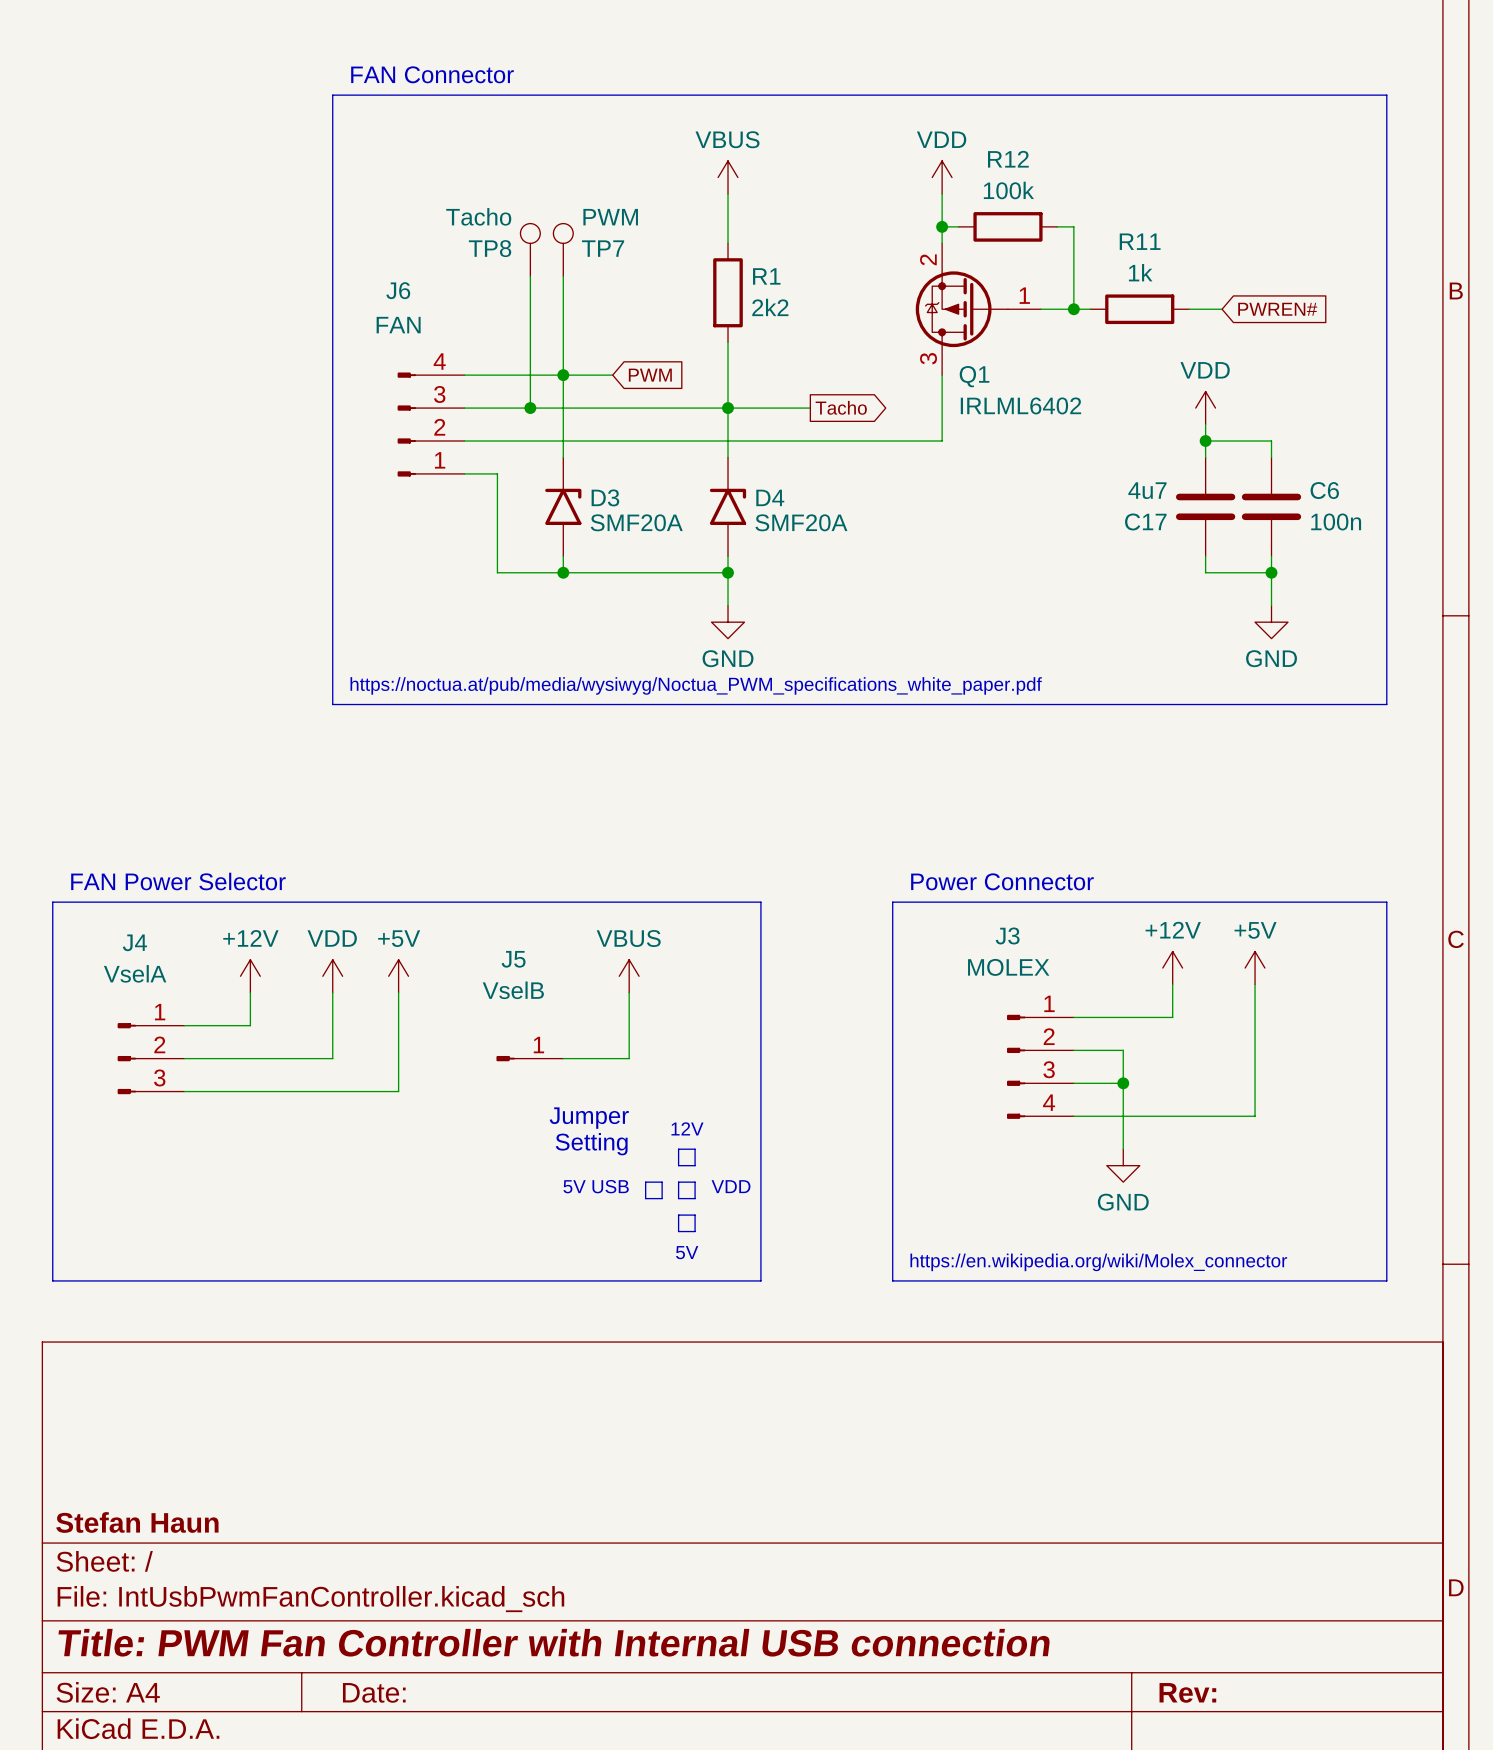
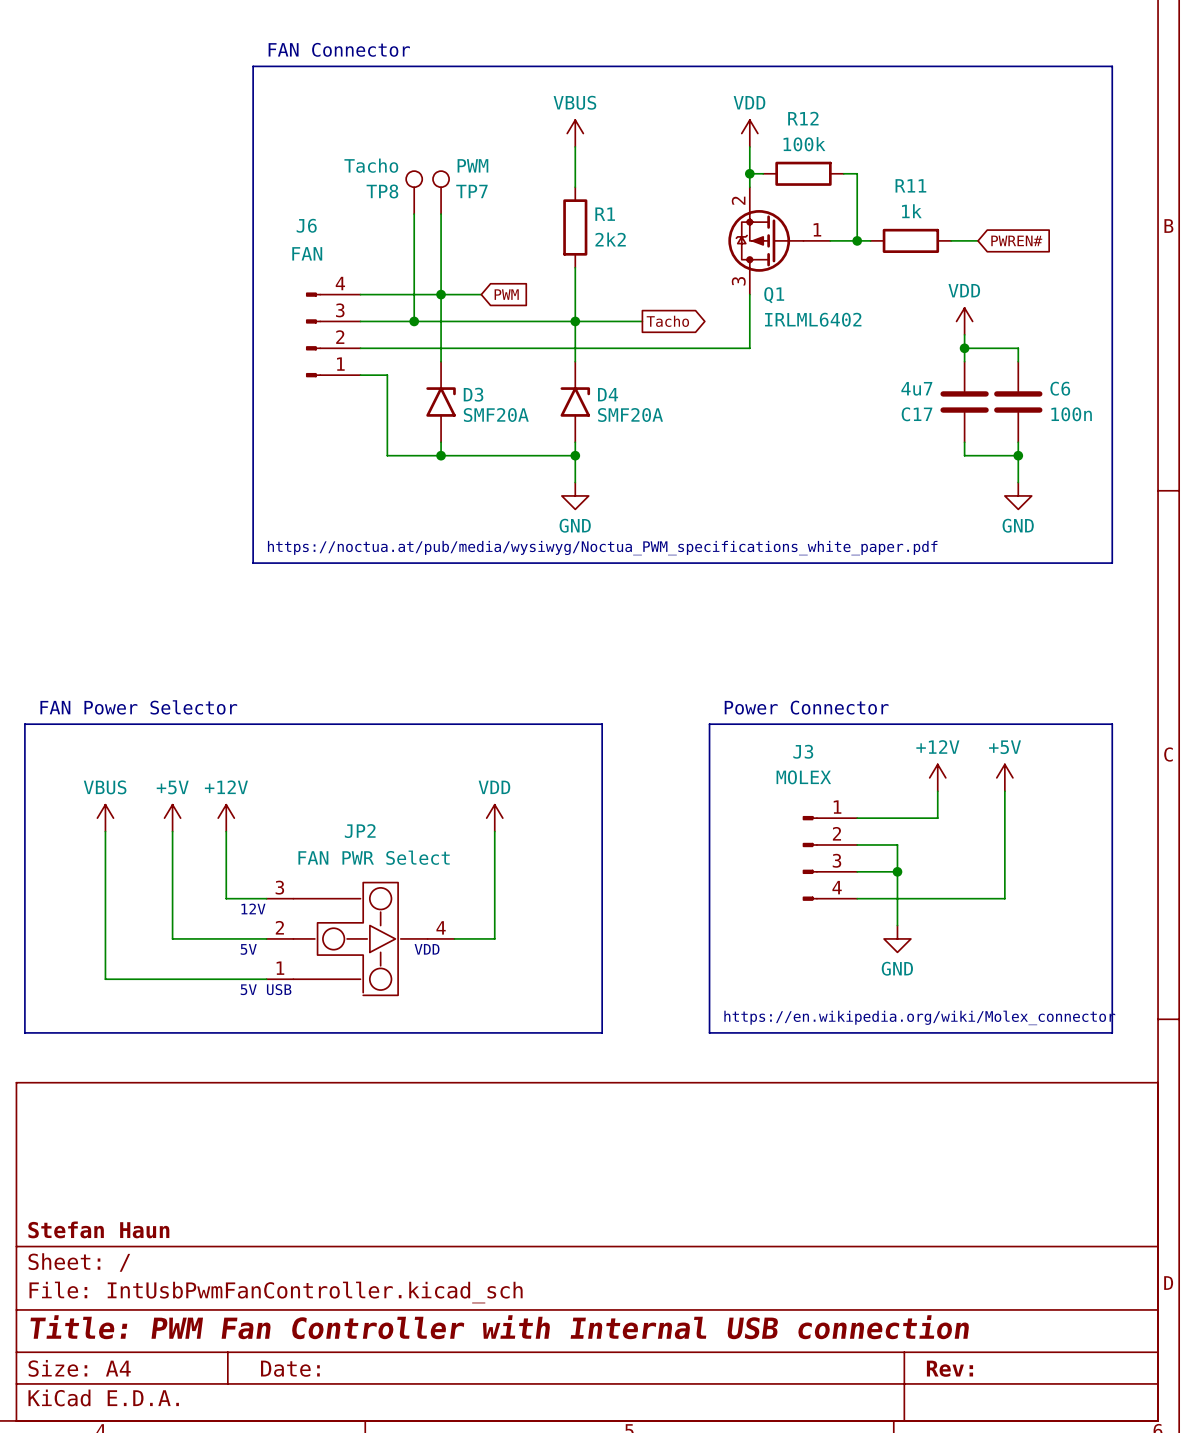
power symbol position: +12V (250, 976) -> +12V (226, 818)
power symbol position: VDD (332, 976) -> VDD (494, 818)
power symbol position: +5V (398, 976) -> +5V (172, 818)
power symbol: VBUS (629, 976) -> none
wire: (250, 992) (250, 1025) (184, 1025) -> none
wire: (332, 992) (332, 1058) (184, 1058) -> none
wire: (398, 992) (398, 1091) (184, 1091) -> none
power symbol: none -> VBUS (105, 818)
wire: none -> (105, 831) (105, 979) (266, 979)
wire: none -> (172, 831) (172, 938) (266, 938)
wire: none -> (226, 831) (226, 898) (266, 898)
J4: VselA (151, 1058) -> none
J5: VselB (529, 1058) -> none
wire: (563, 1058) (629, 1058) -> (454, 938) (494, 938) (494, 851)
text: Jumper (589, 1118) -> none
text: none -> 12V (253, 908)
text: 12V (687, 1128) -> none
text: Setting (591, 1144) -> none
line: (678, 1149) (695, 1149) (695, 1165) (678, 1165) (678, 1149) -> none
JP2: none -> FAN PWR Select (360, 938)
text: none -> 5V (248, 949)
line: (645, 1182) (662, 1182) (662, 1198) (645, 1198) (645, 1182) -> none
line: (678, 1182) (678, 1198) (695, 1198) (695, 1182) (678, 1182) -> none
text position: 5V USB (596, 1186) -> 5V USB (266, 989)
text position: VDD (731, 1186) -> VDD (427, 949)
line: (678, 1215) (678, 1231) (695, 1231) (695, 1215) (678, 1215) -> none
text: 5V (687, 1252) -> none

